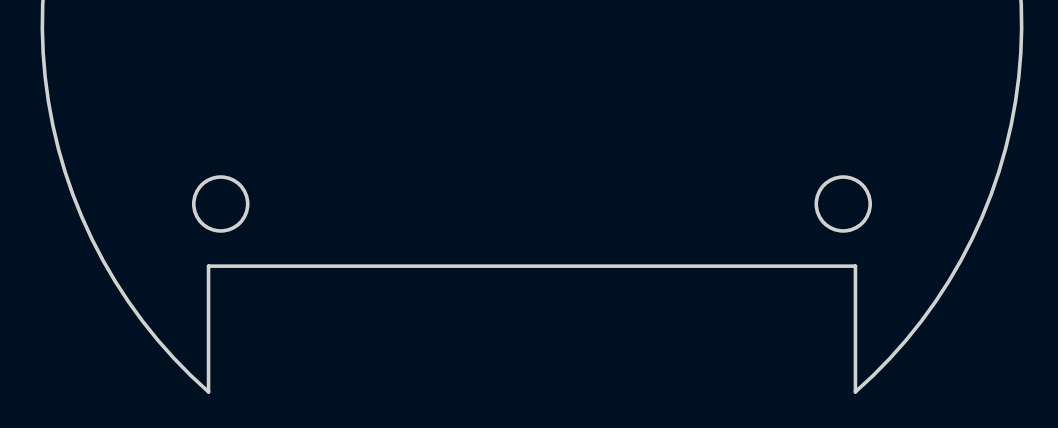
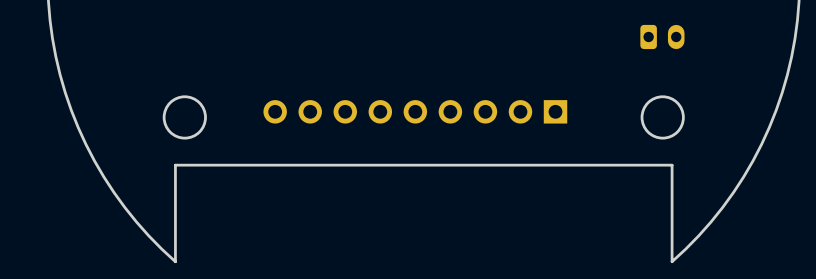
part: none -> (662, 36)
part: none -> (415, 111)

